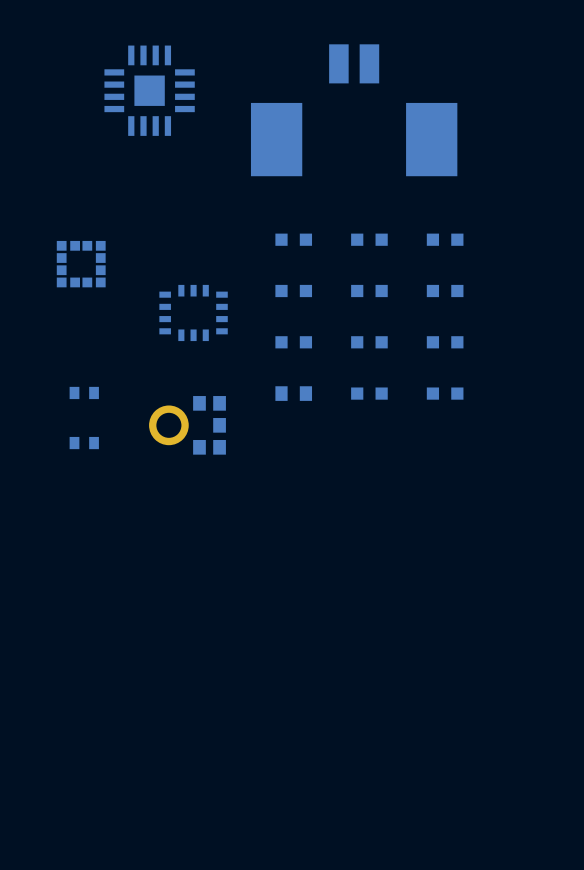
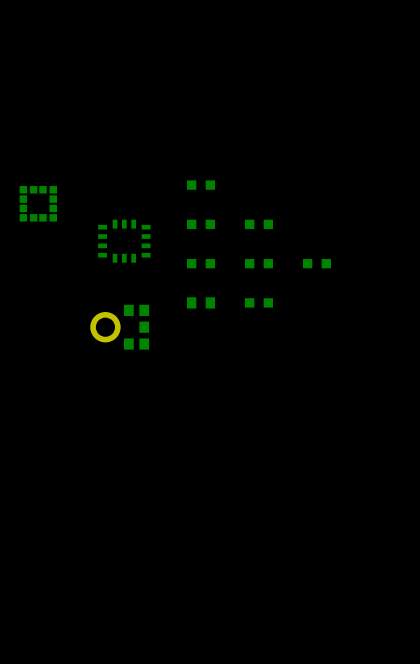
part: (149, 90) -> none
part: (354, 110) -> none
part: (369, 239) -> none
part: (445, 239) -> none
part: (445, 291) -> none
part: (84, 392) -> none
part: (445, 393) -> none
part: (84, 443) -> none

